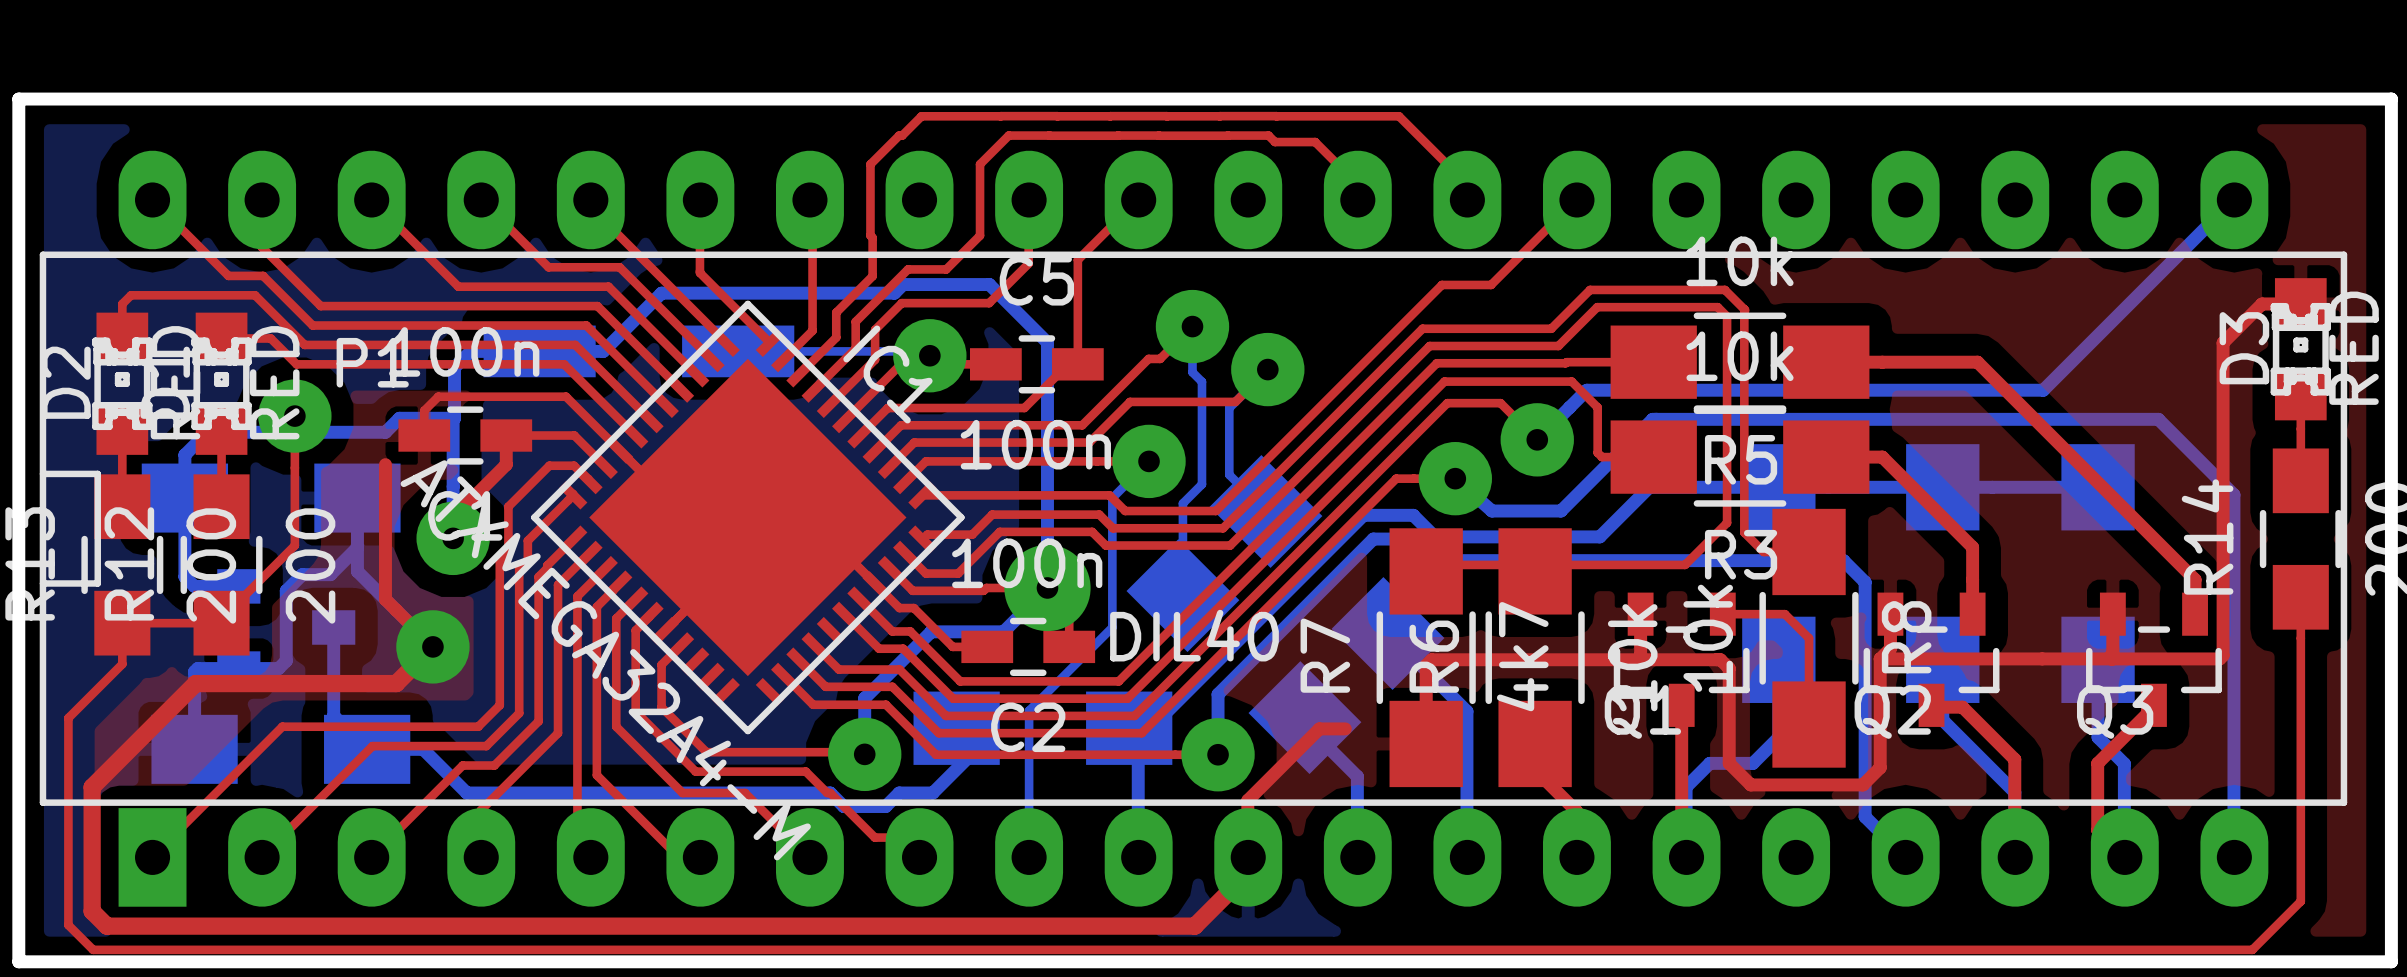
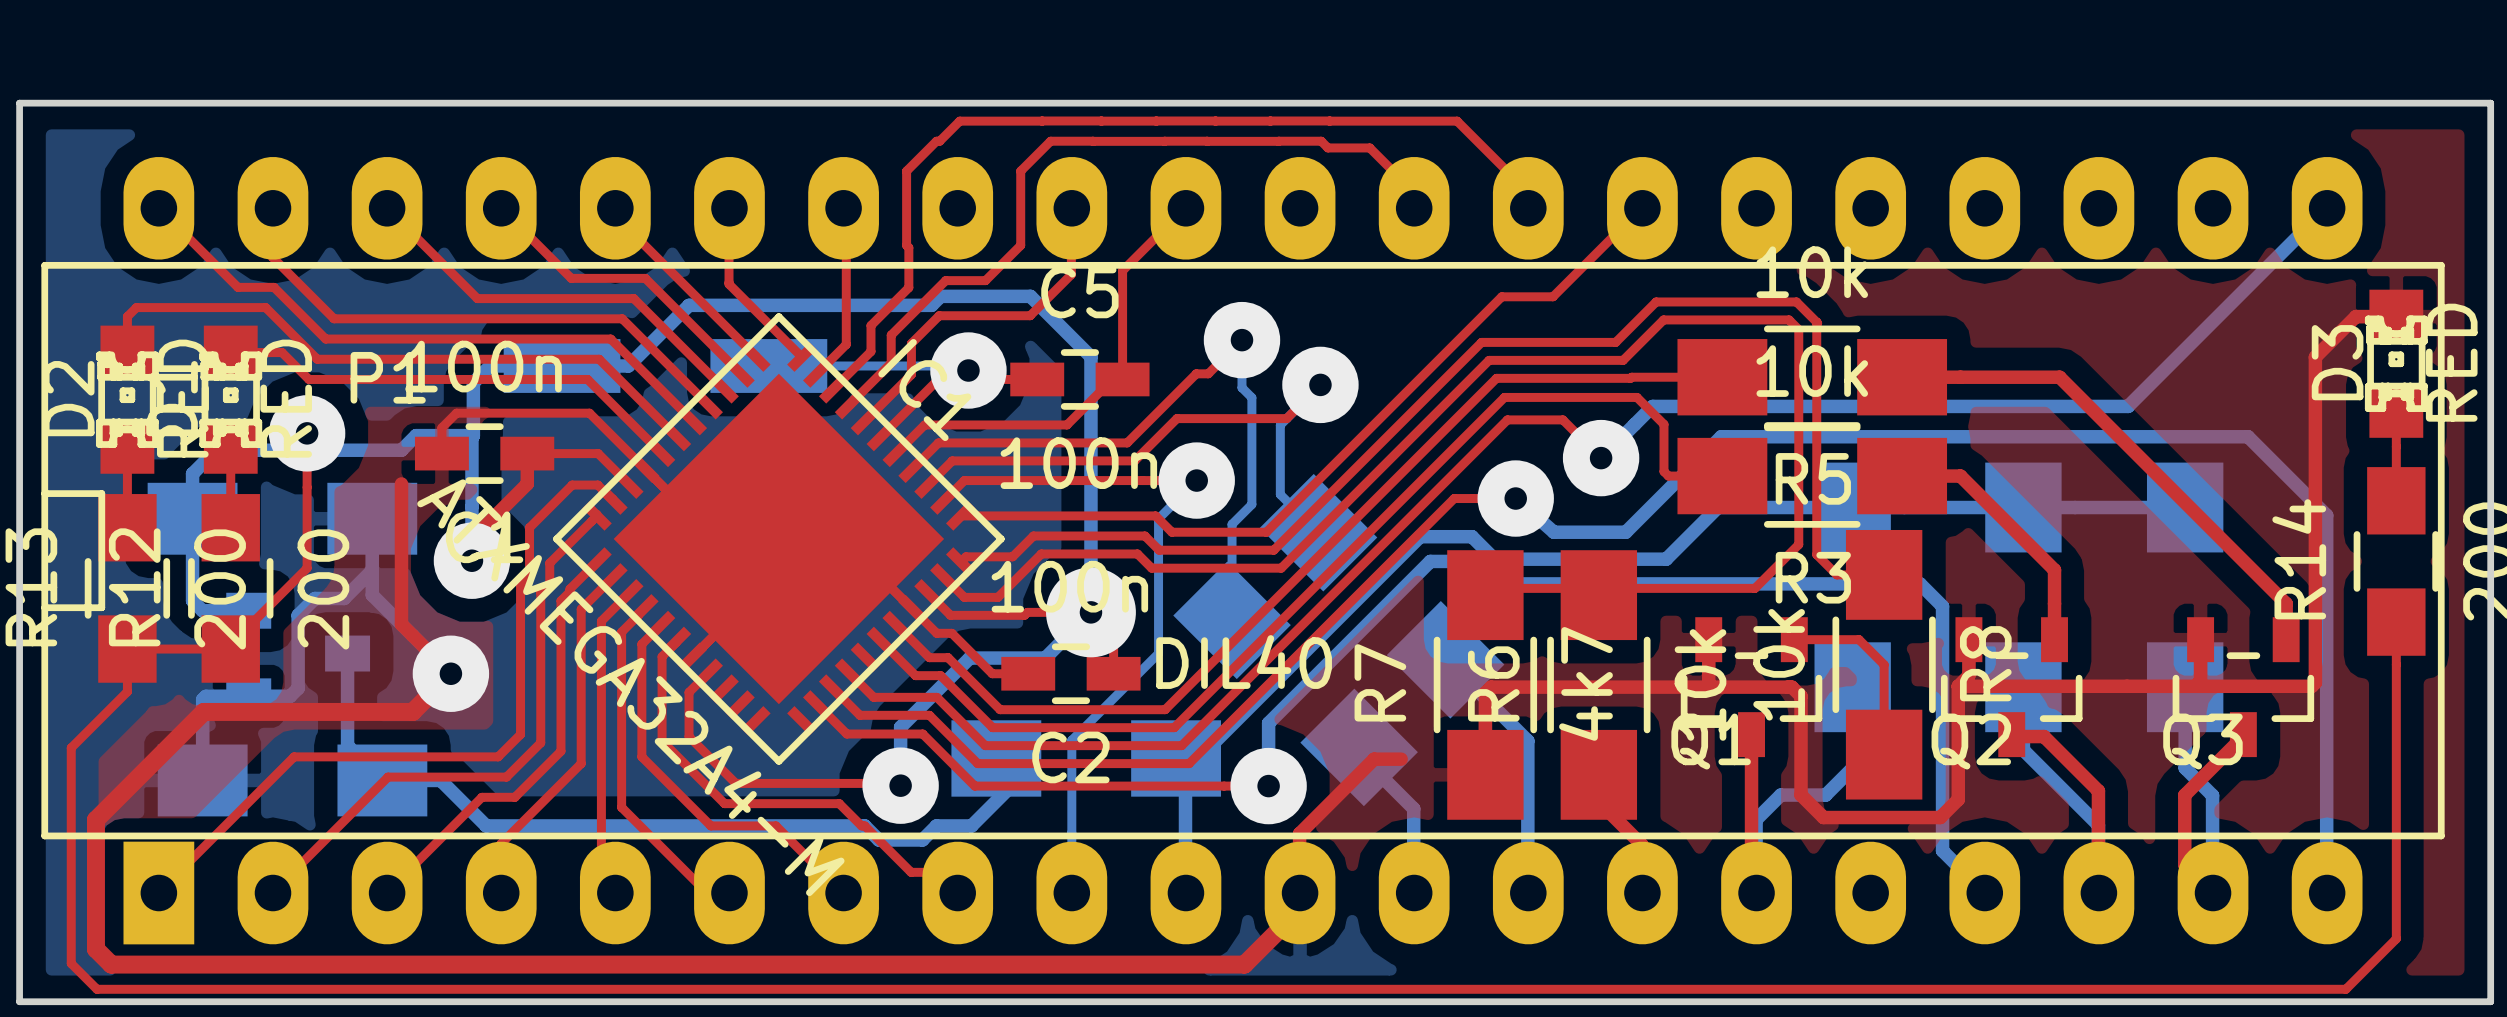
board edge width: thick (18, 99) (18, 961) (2391, 961) (2391, 99) (18, 99) -> thin (19, 103) (19, 1001) (2490, 1001) (2490, 103) (19, 103)

